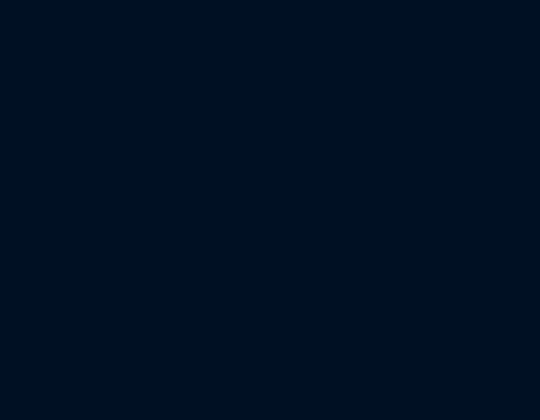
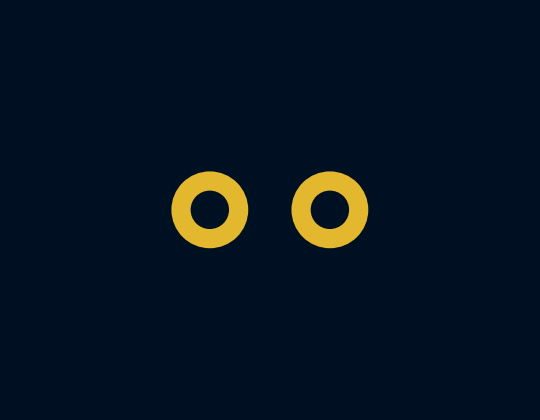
part: none -> (269, 209)

